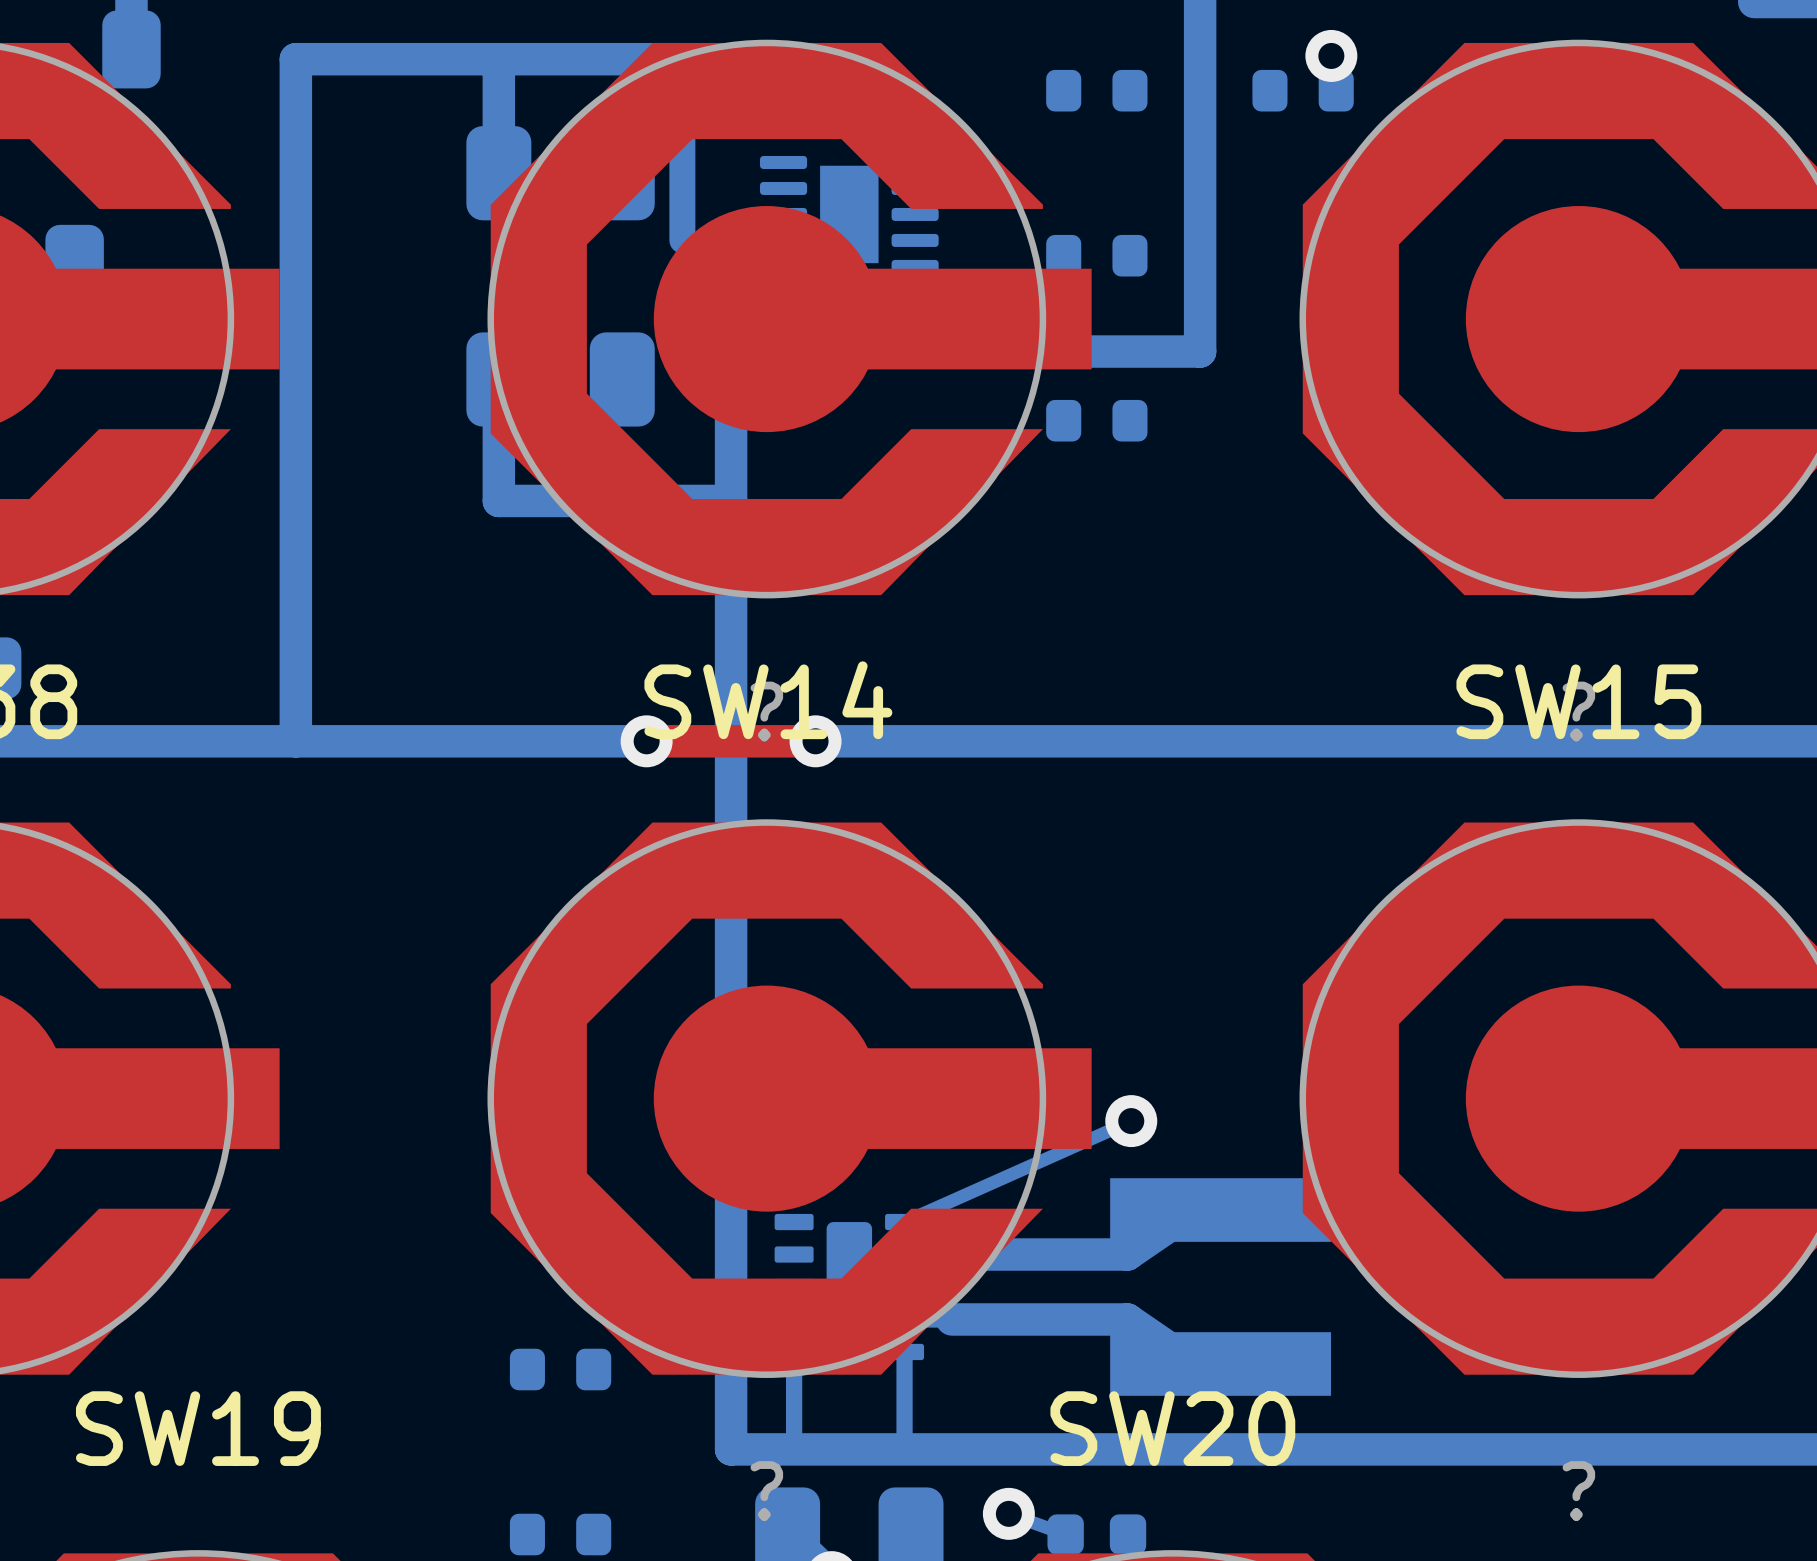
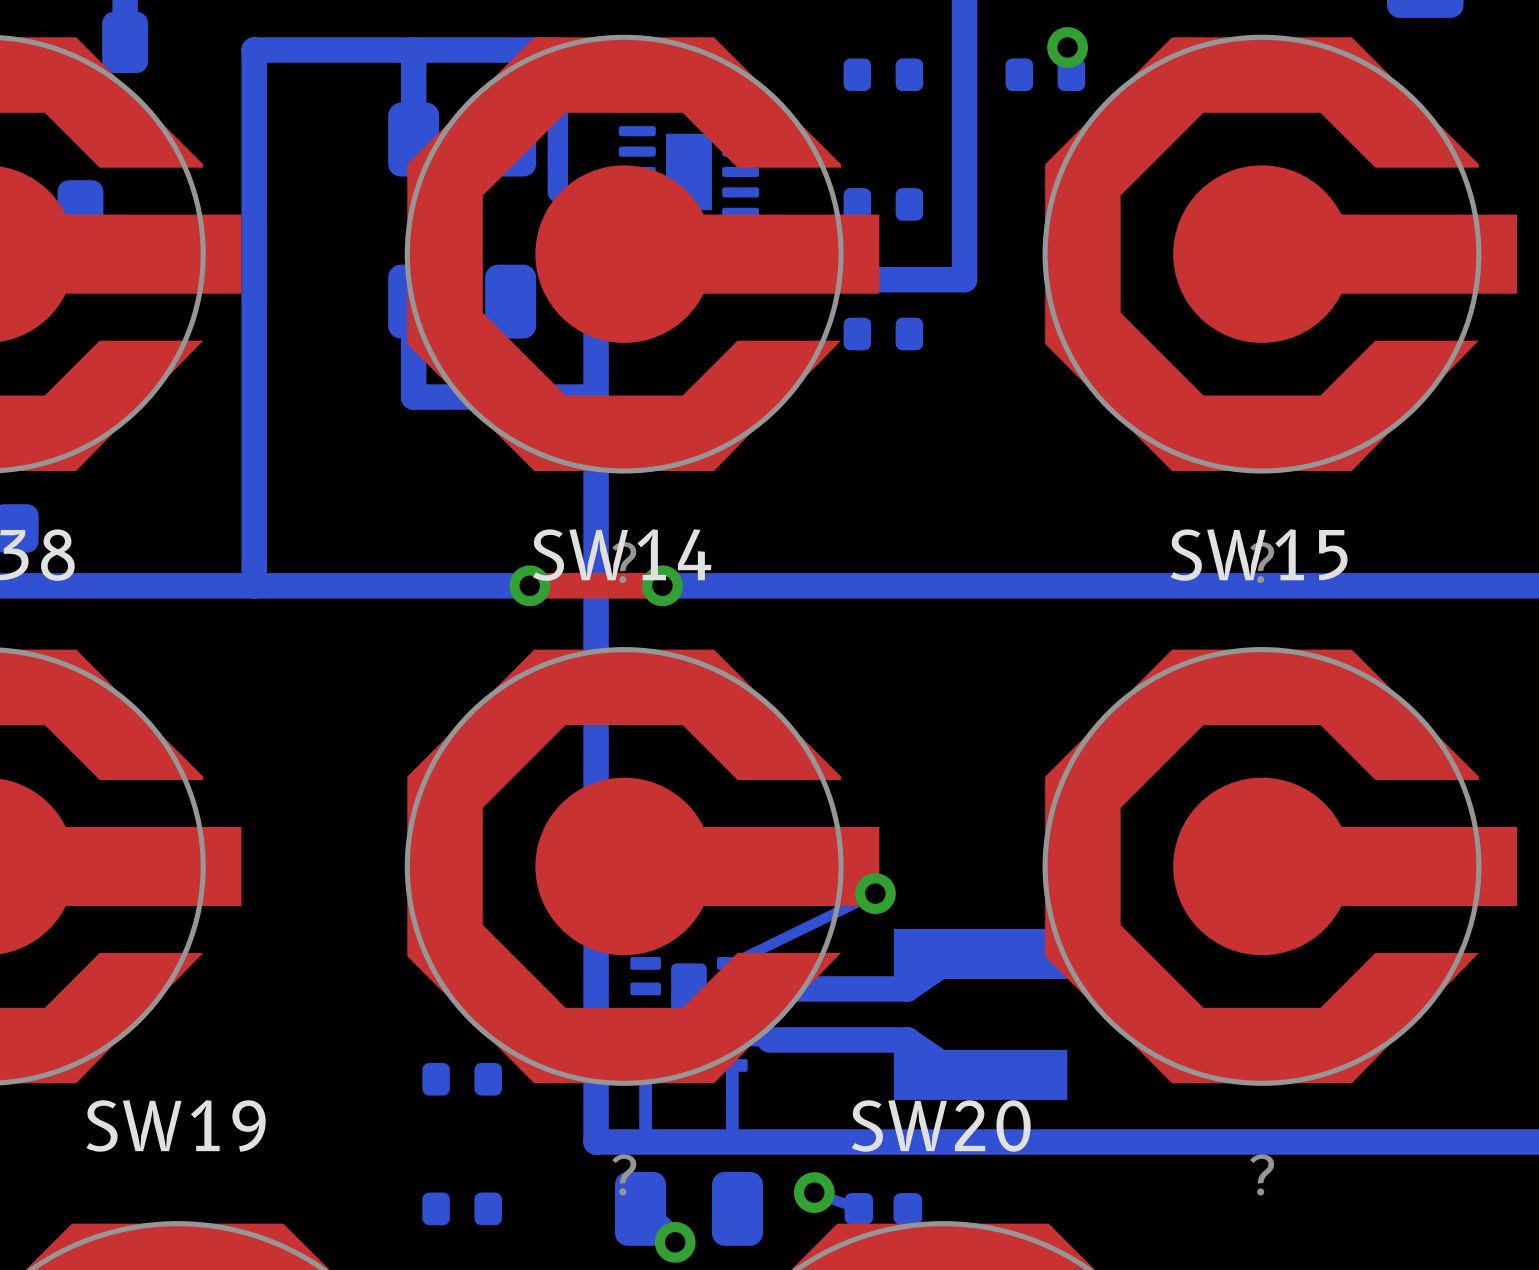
bottom track: (1131, 1121) (904, 1222) -> (875, 893) (732, 963)
via position: (1131, 1121) -> (875, 893)

